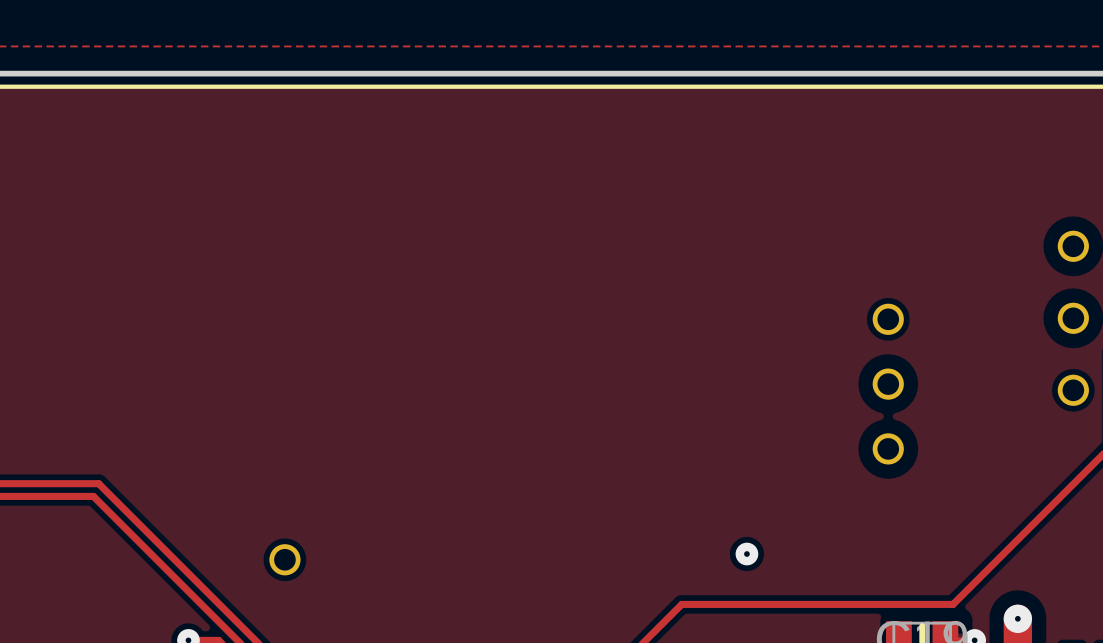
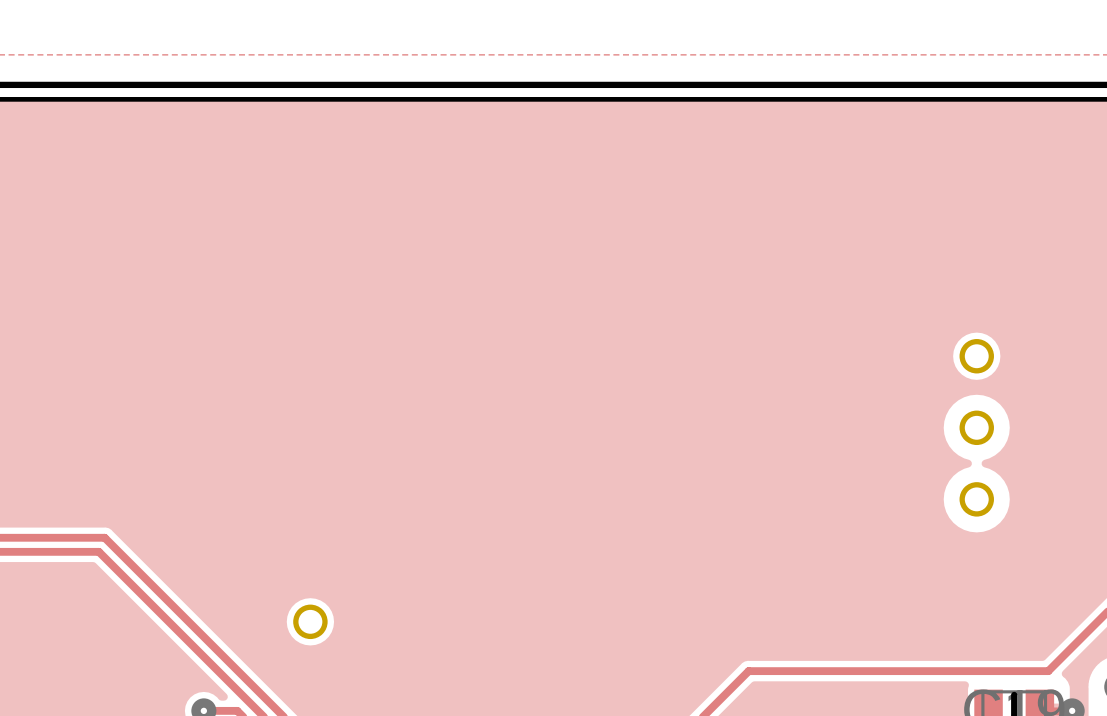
via: (746, 554) -> none

